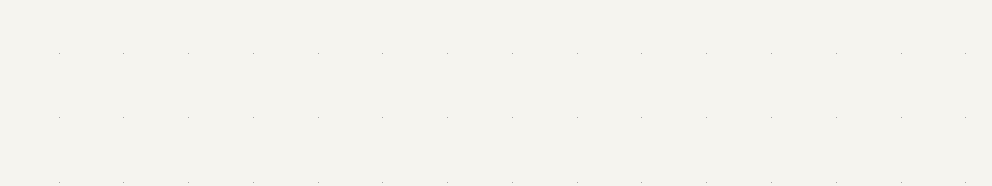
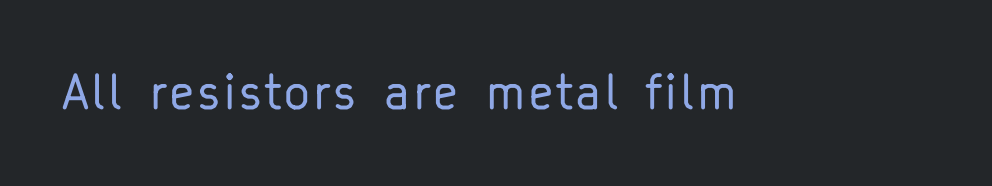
text: none -> All resistors are metal film (397, 91)

